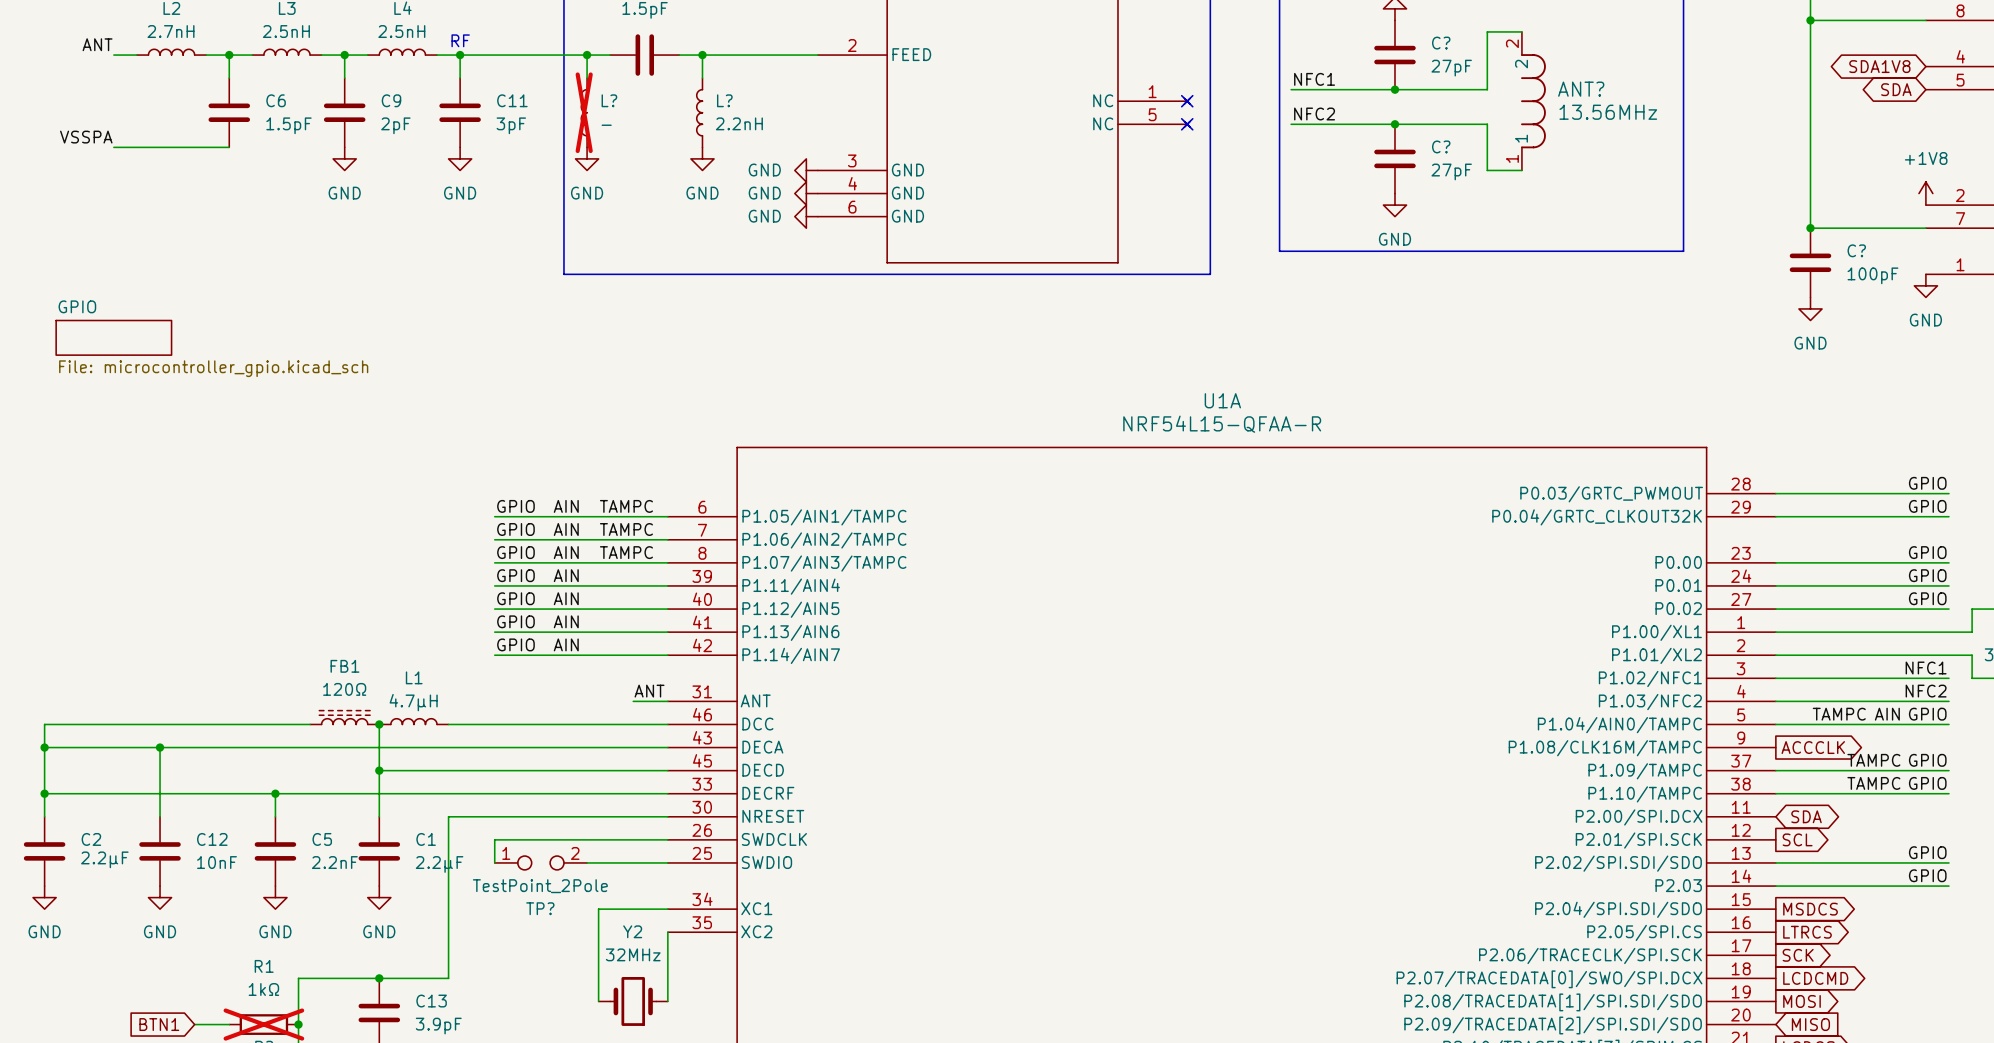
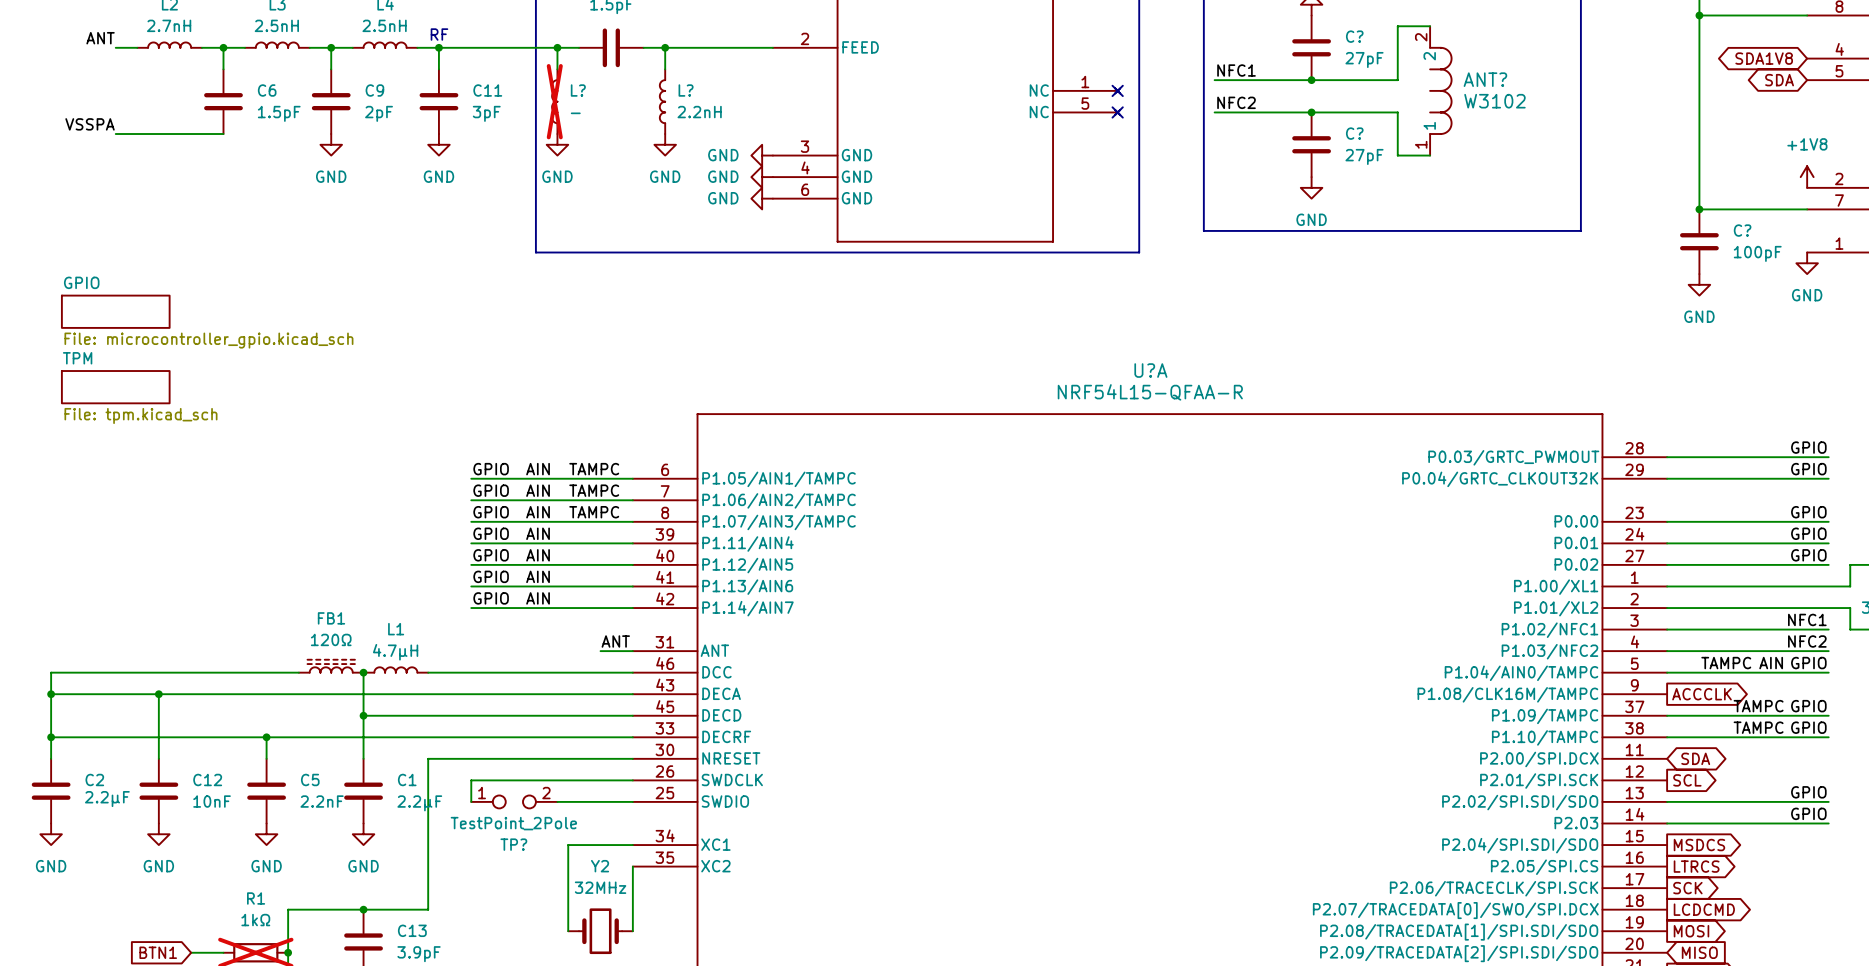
ANT? value: 13.56MHz (1608, 112) -> W3102 (1494, 101)
U1A name: U1A (1222, 400) -> U?A (1150, 370)
sheet TPM: none -> File: tpm.kicad_sch (115, 387)

